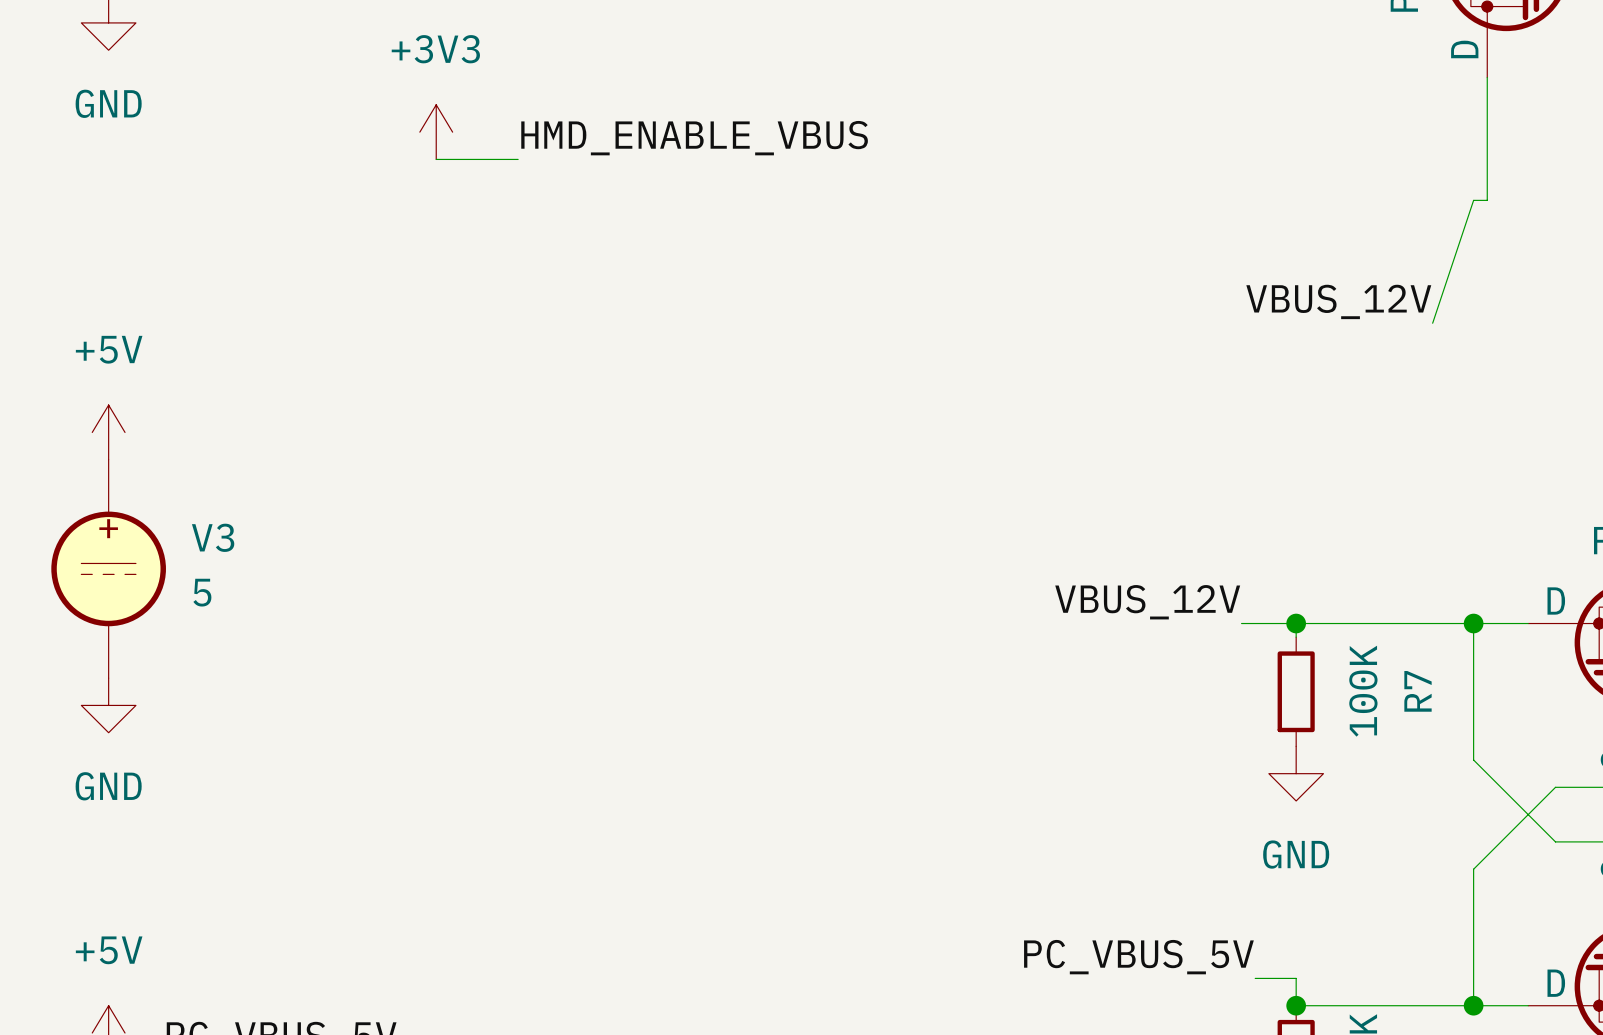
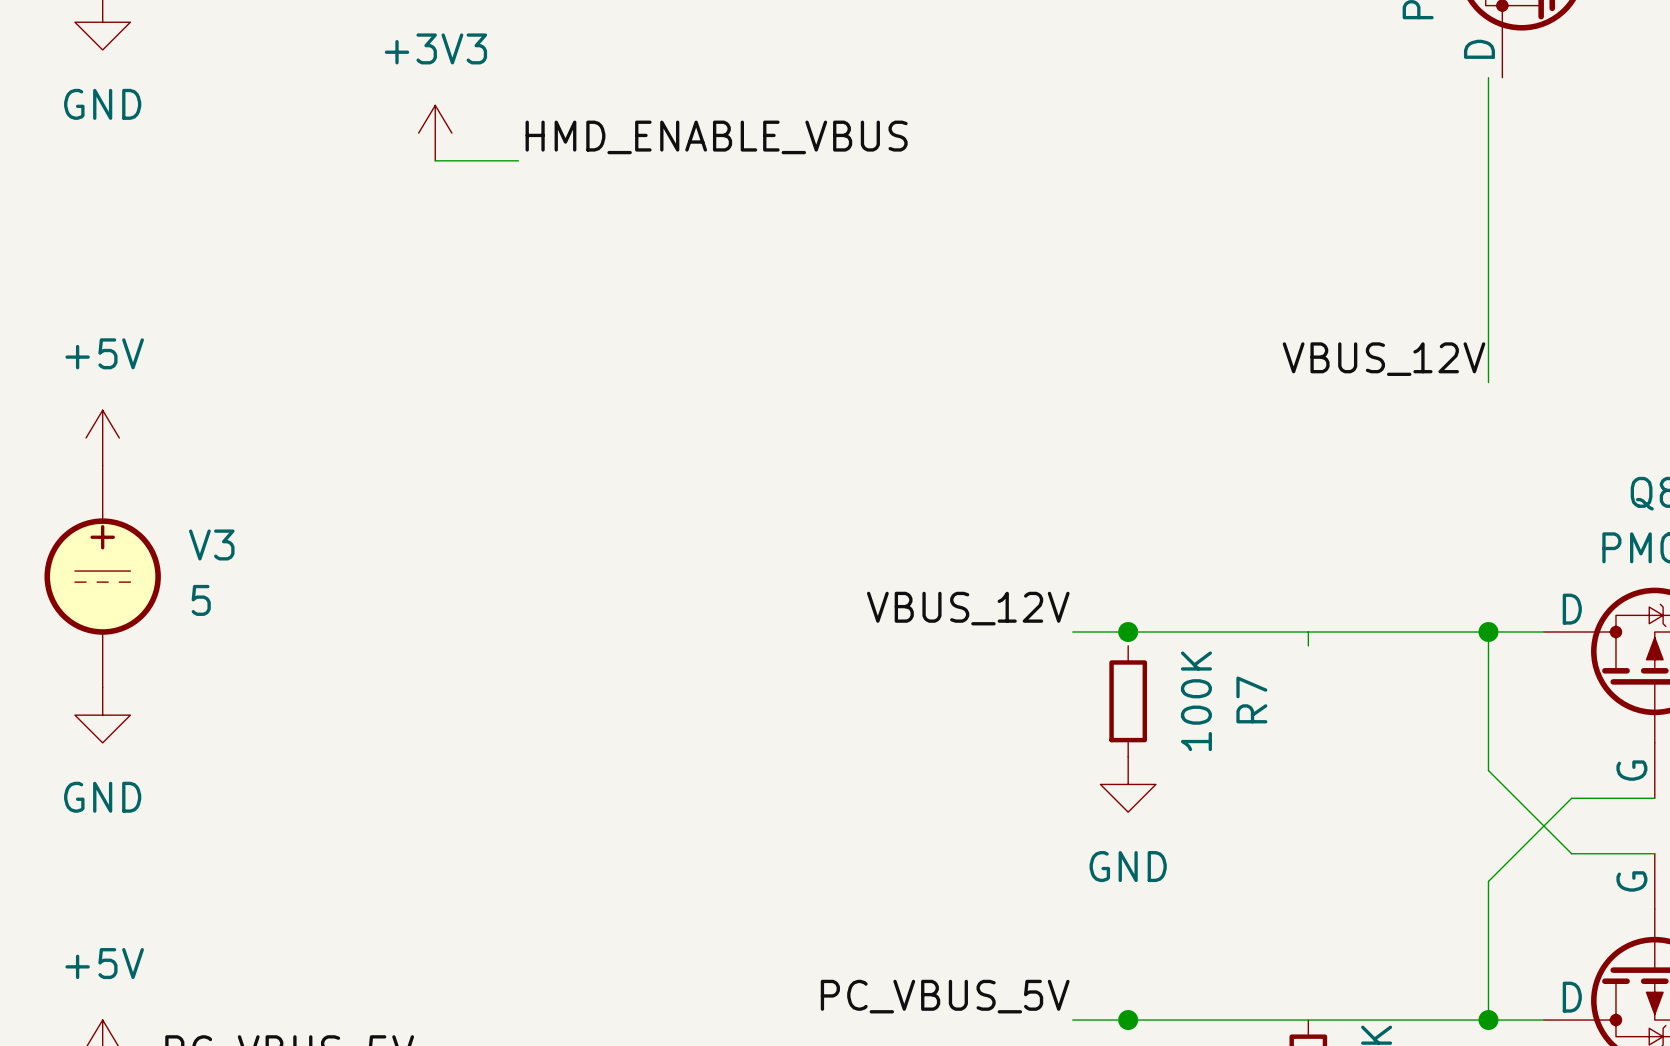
wire: none -> (1488, 77) (1488, 382)
wire: (1487, 77) (1487, 200) (1473, 200) (1432, 323) -> none
label position: VBUS_12V (1338, 301) -> VBUS_12V (1384, 359)
label position: VBUS_12V (1147, 602) -> VBUS_12V (968, 608)
wire: none -> (1072, 632) (1252, 632)
junction: none -> (1128, 632)
junction: (1296, 623) -> none
R7 position: (1296, 691) -> (1128, 701)
power symbol position: GND (1296, 773) -> GND (1128, 784)
label position: PC_VBUS_5V (1138, 957) -> PC_VBUS_5V (945, 996)
wire: (1255, 978) (1296, 978) (1296, 1005) -> (1072, 1020) (1308, 1020)
junction: none -> (1128, 1020)
junction: (1296, 1005) -> none

